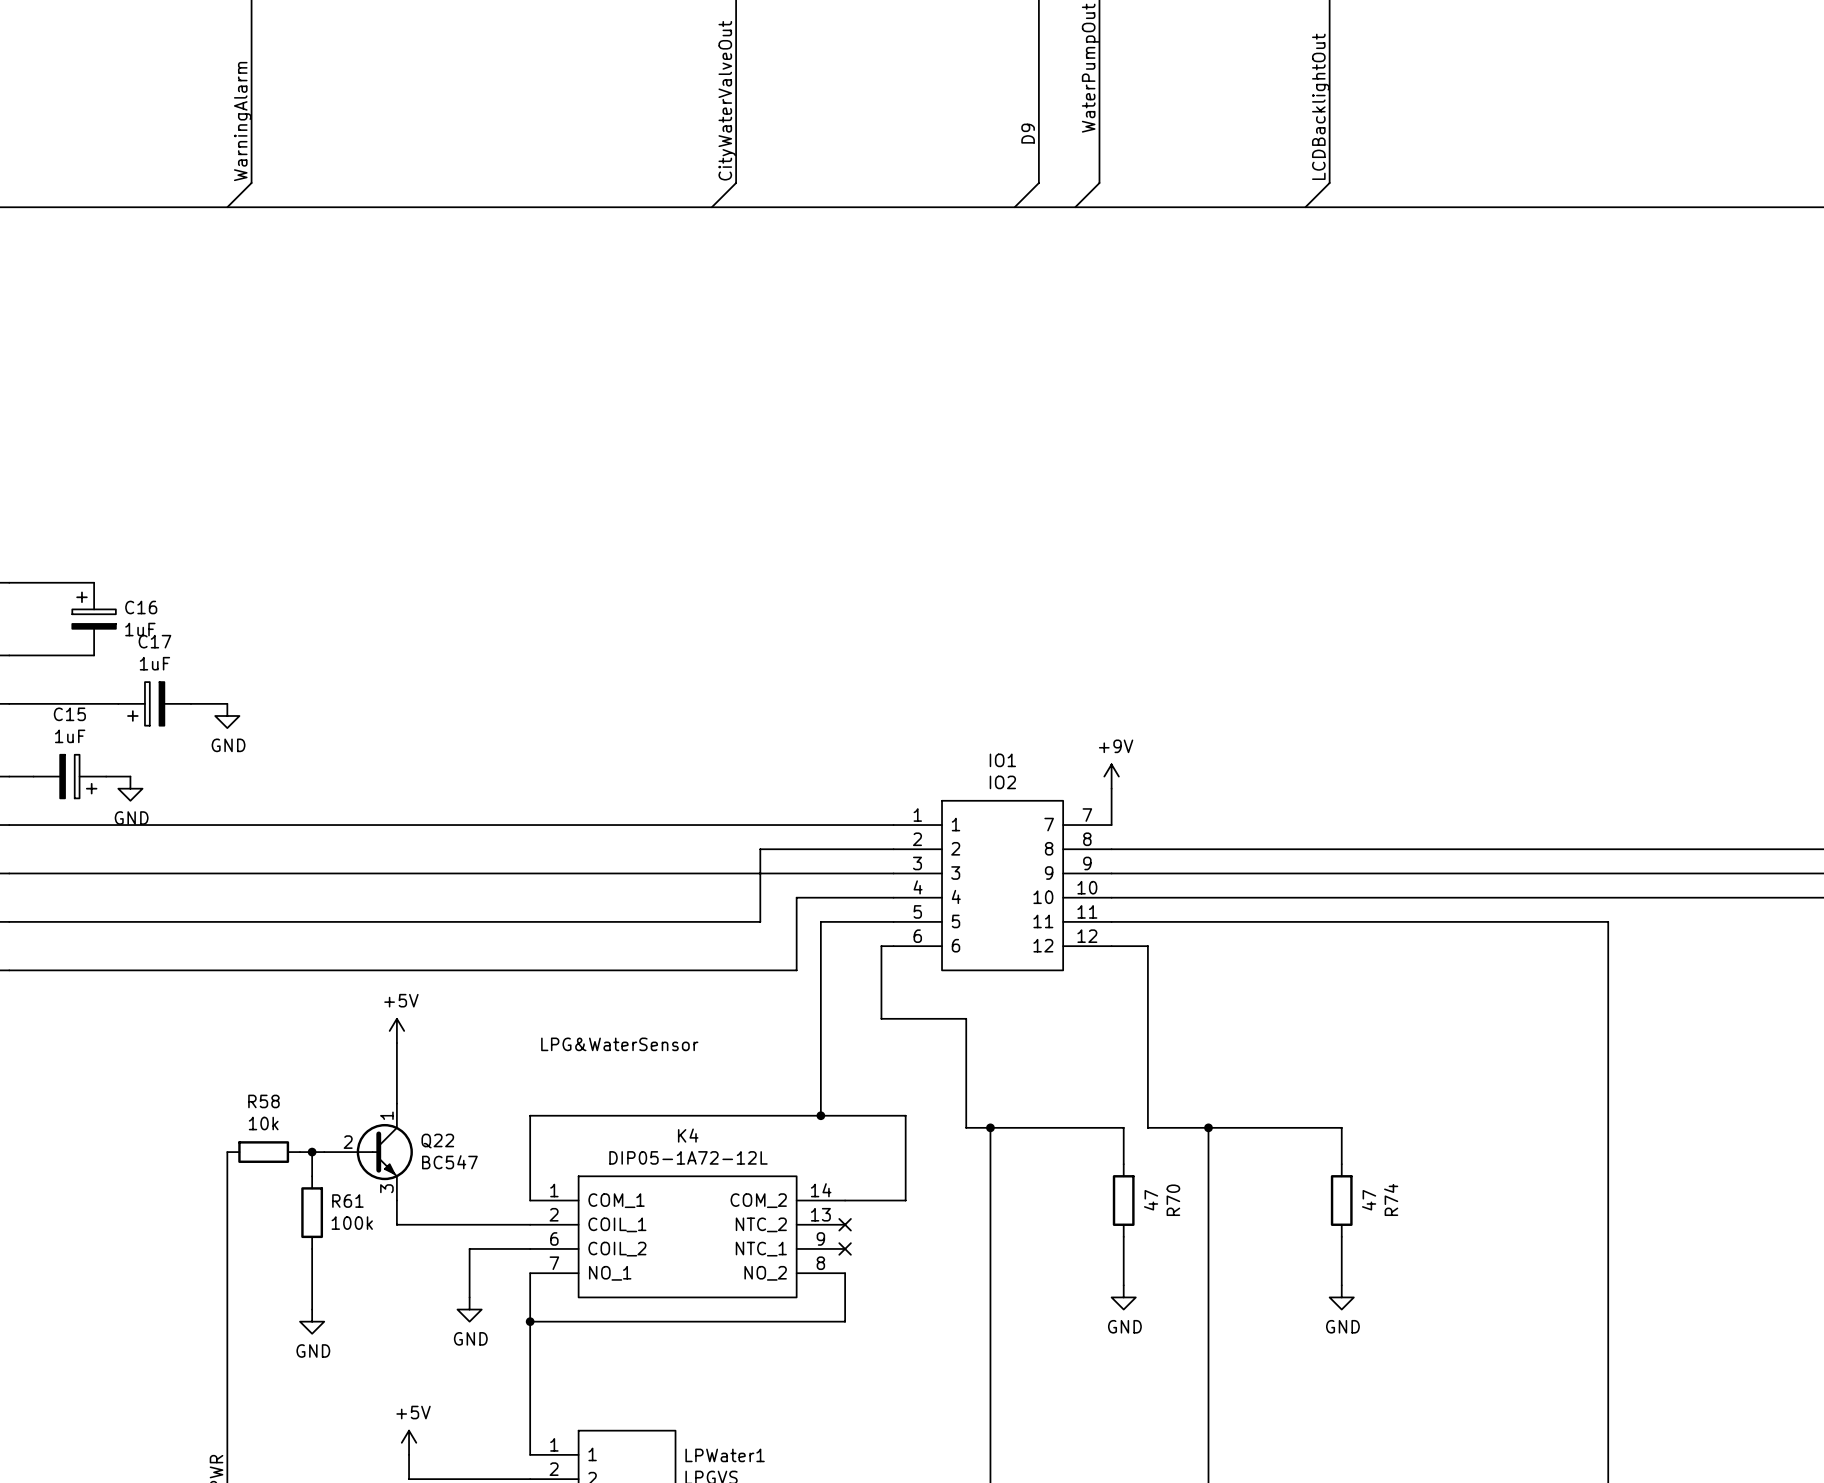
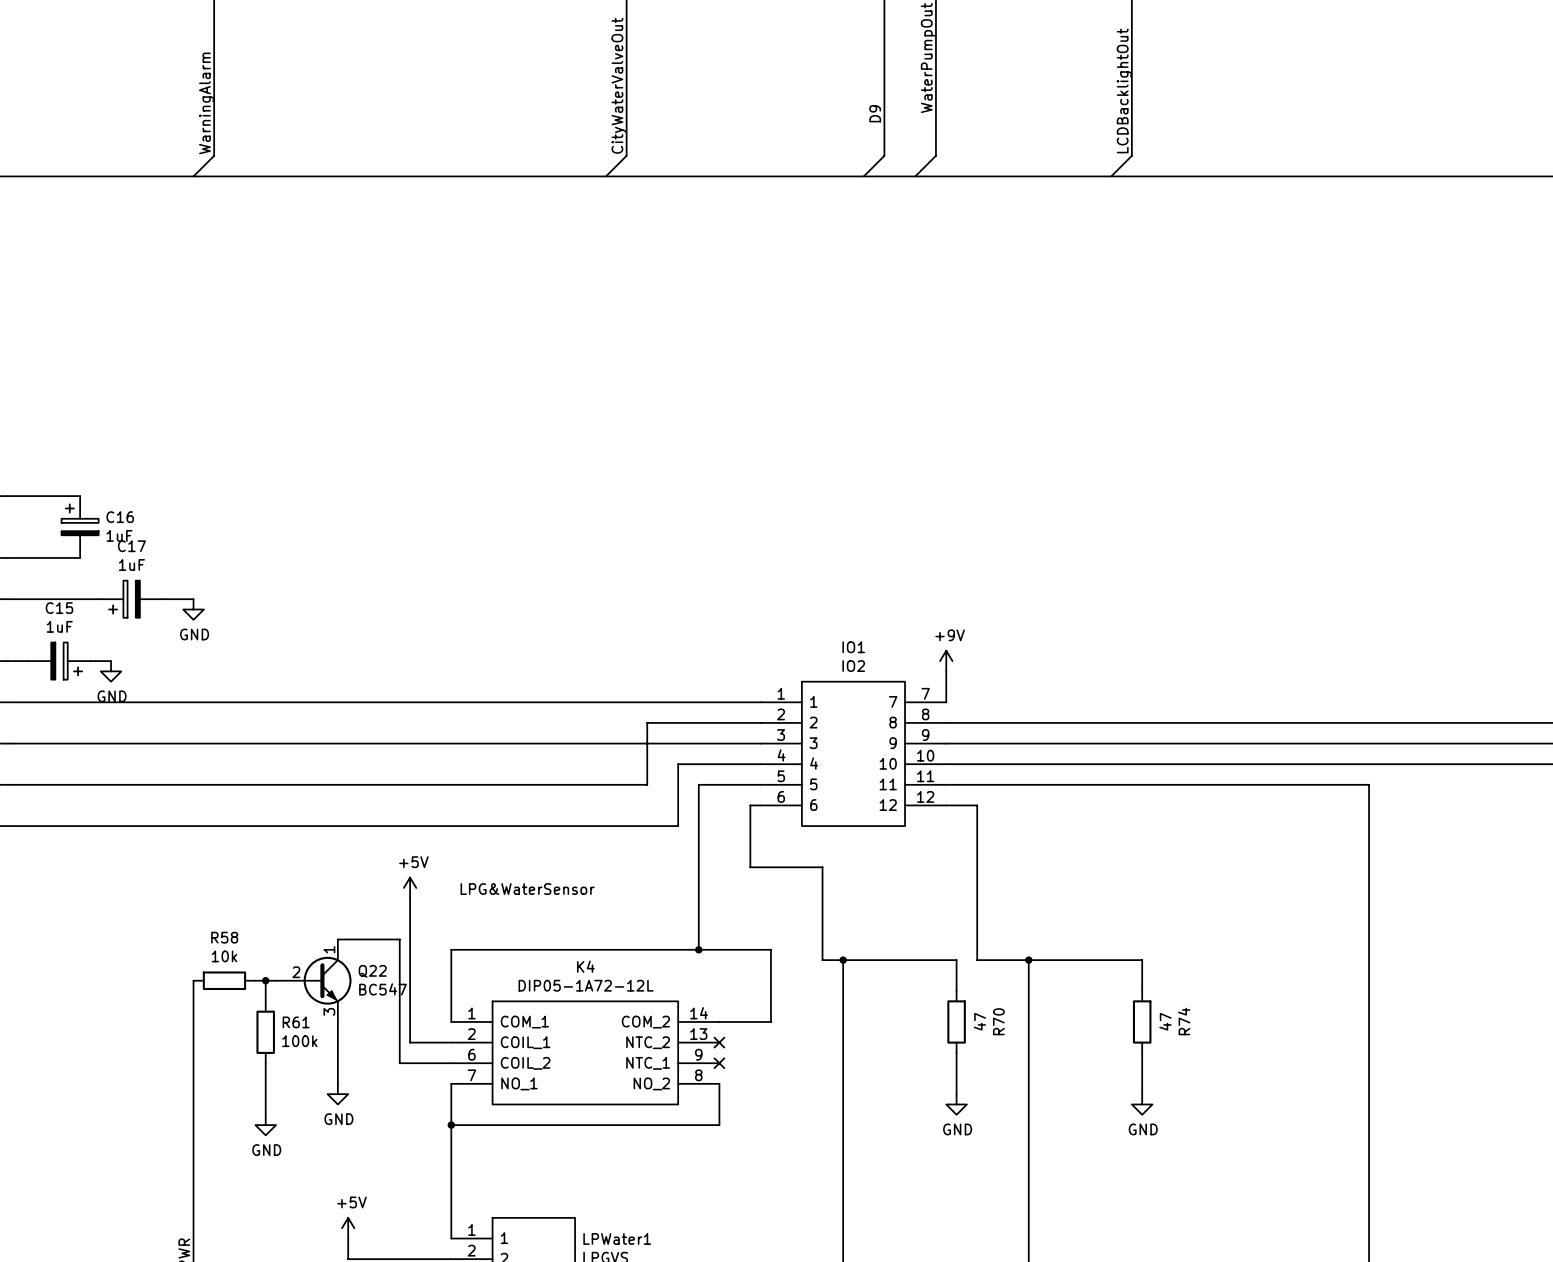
power symbol position: +5V (396, 1030) -> +5V (410, 887)
wire: (396, 1043) (396, 1103) -> none
wire: none -> (410, 898) (410, 1042)
wire: (396, 1224) (481, 1224) -> (337, 1042) (337, 1083)
wire: (469, 1248) (469, 1297) -> (399, 1063) (399, 939) (337, 939)
power symbol position: GND (469, 1309) -> GND (337, 1094)

